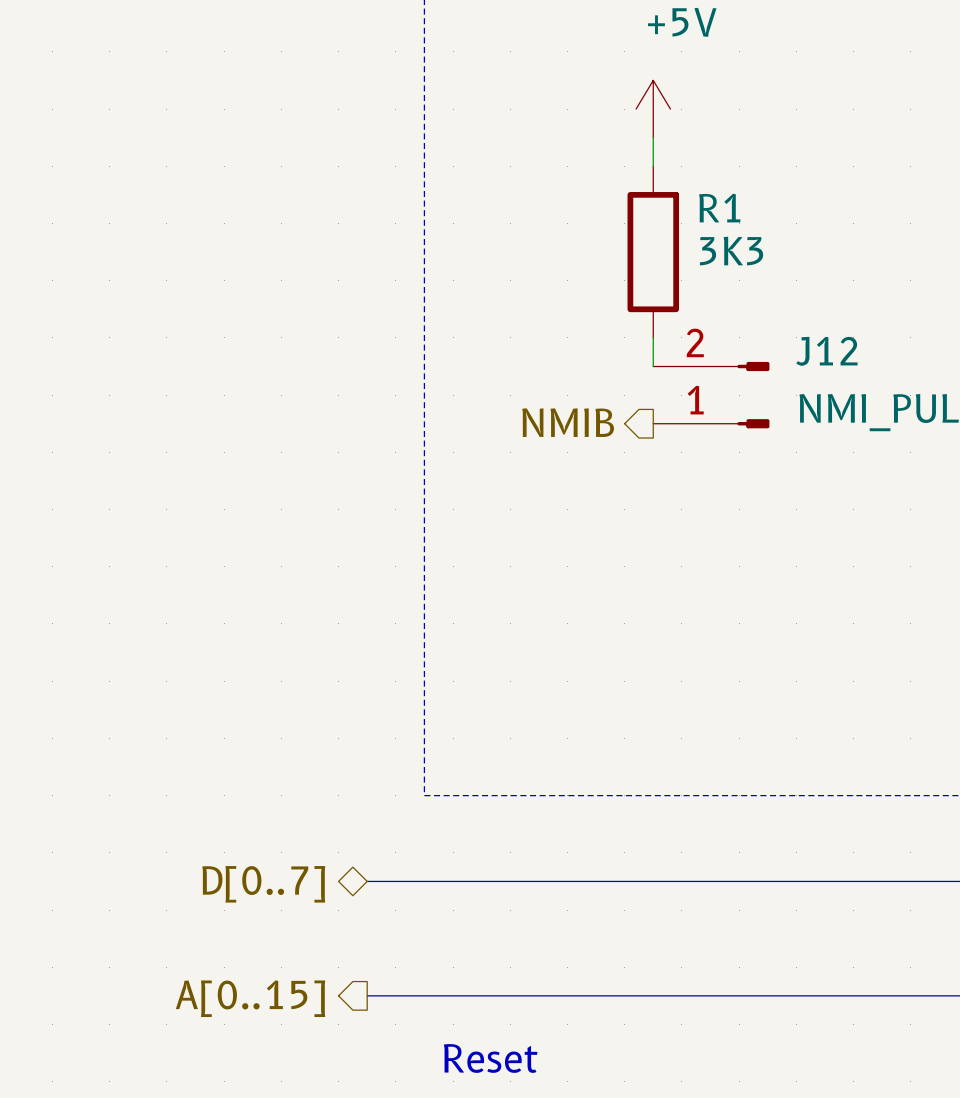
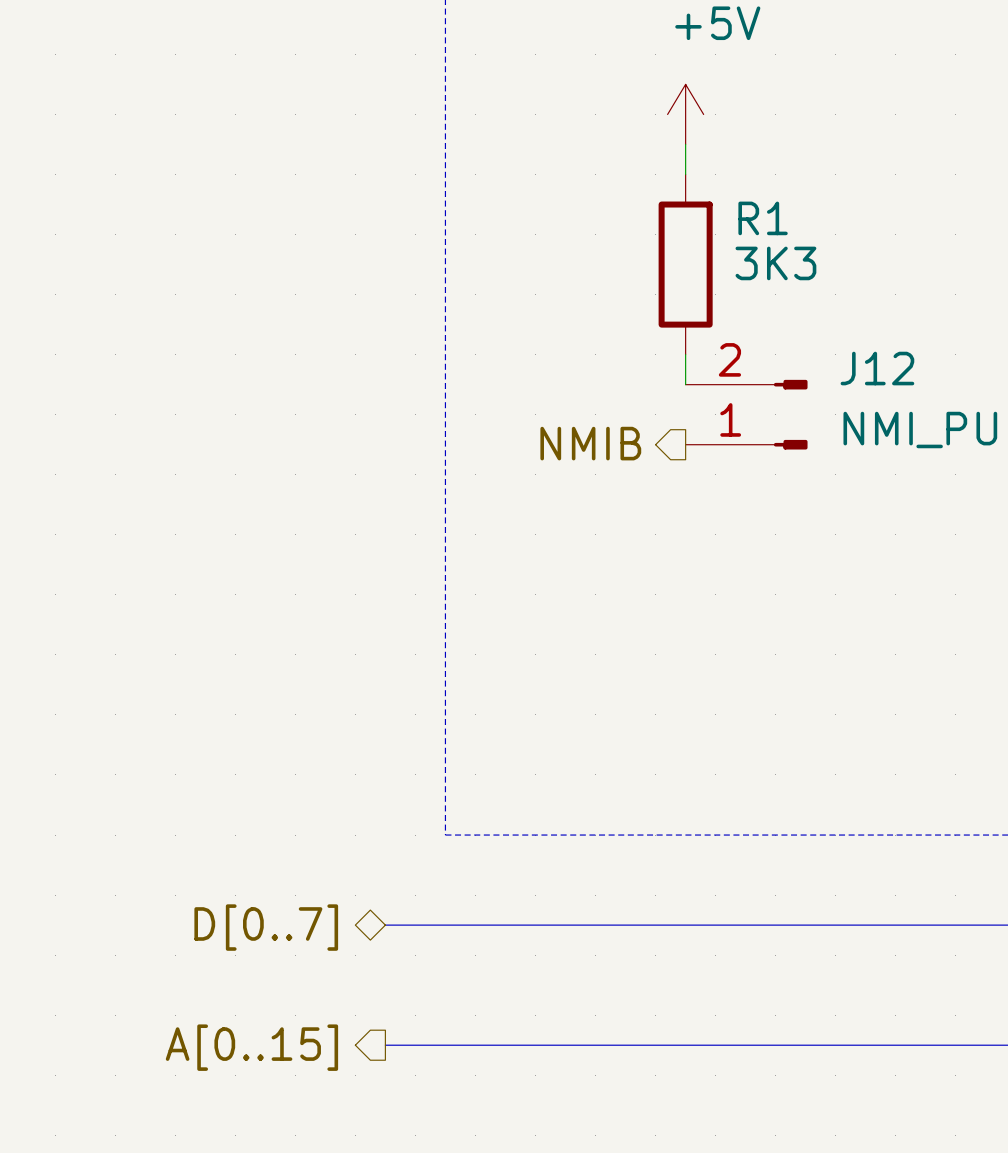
text: Reset (490, 1058) -> none

